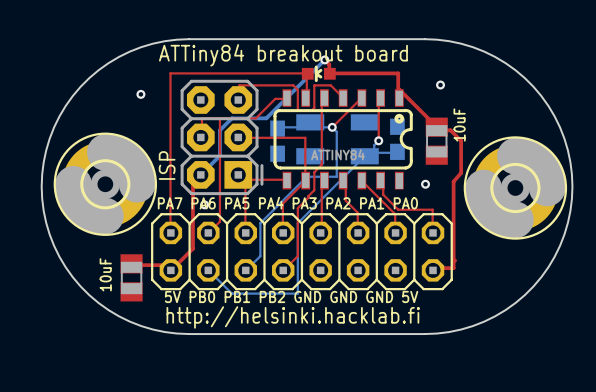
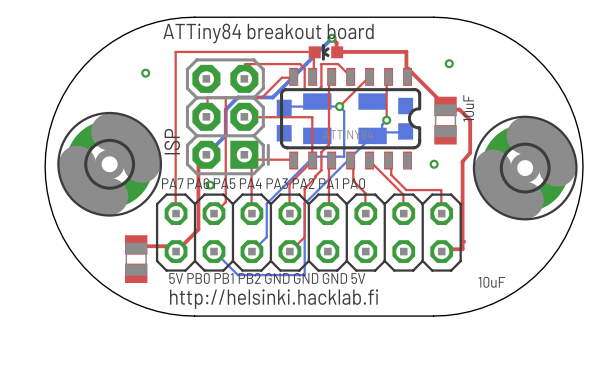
drawing: [394, 113, 405, 124] -> none
text rotation: 0° (105, 274) -> 90° clockwise (491, 282)
text position: 10uF (105, 274) -> 10uF (491, 282)

